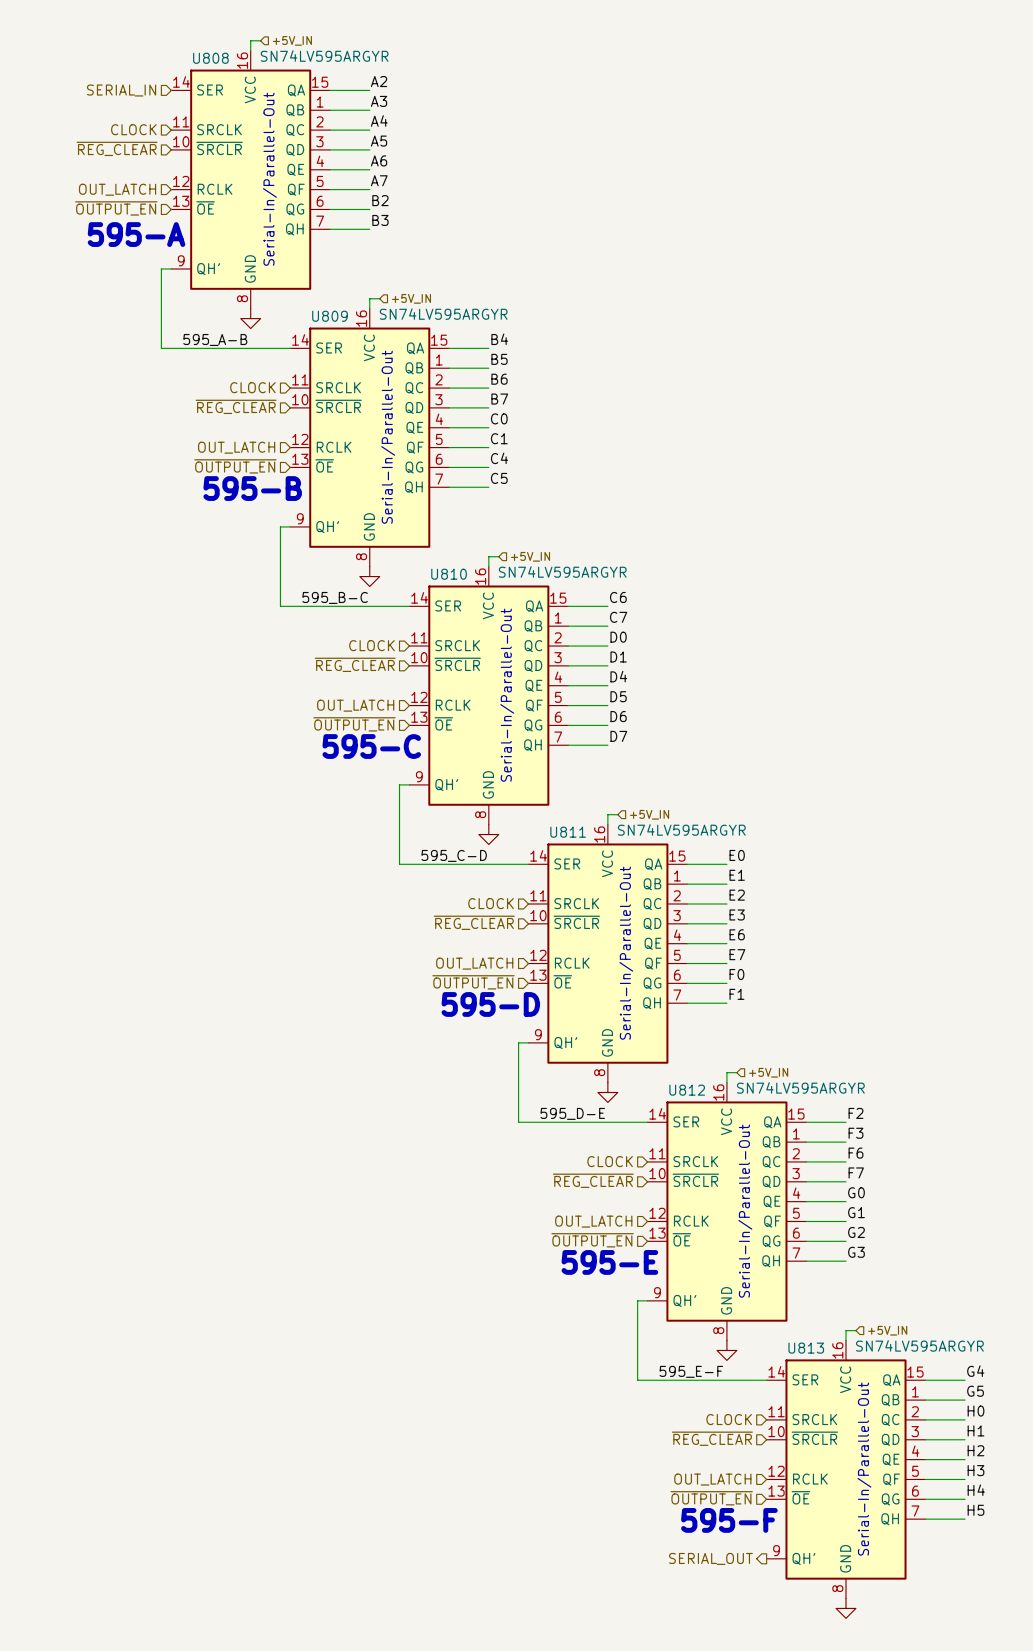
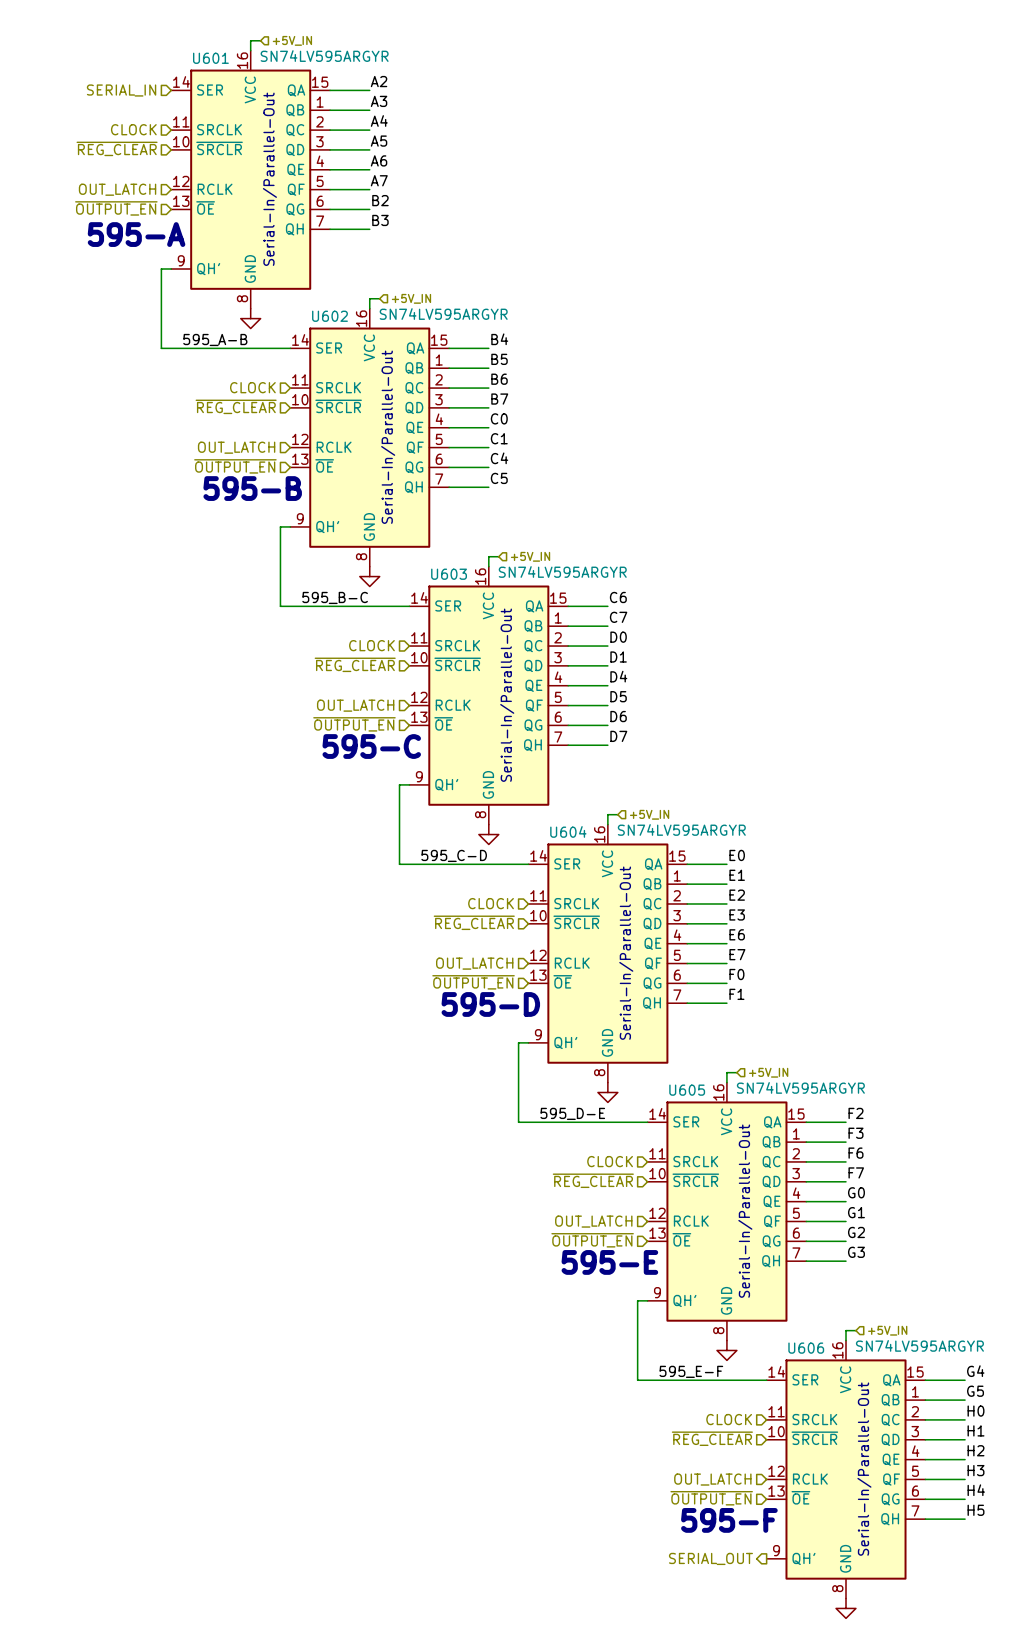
U808 name: U808 (210, 58) -> U601 (210, 58)
U809 name: U809 (329, 316) -> U602 (329, 316)
U810 name: U810 (449, 574) -> U603 (449, 574)
U811 name: U811 (568, 832) -> U604 (568, 831)
U812 name: U812 (687, 1090) -> U605 (687, 1090)
U813 name: U813 (806, 1348) -> U606 (806, 1348)

